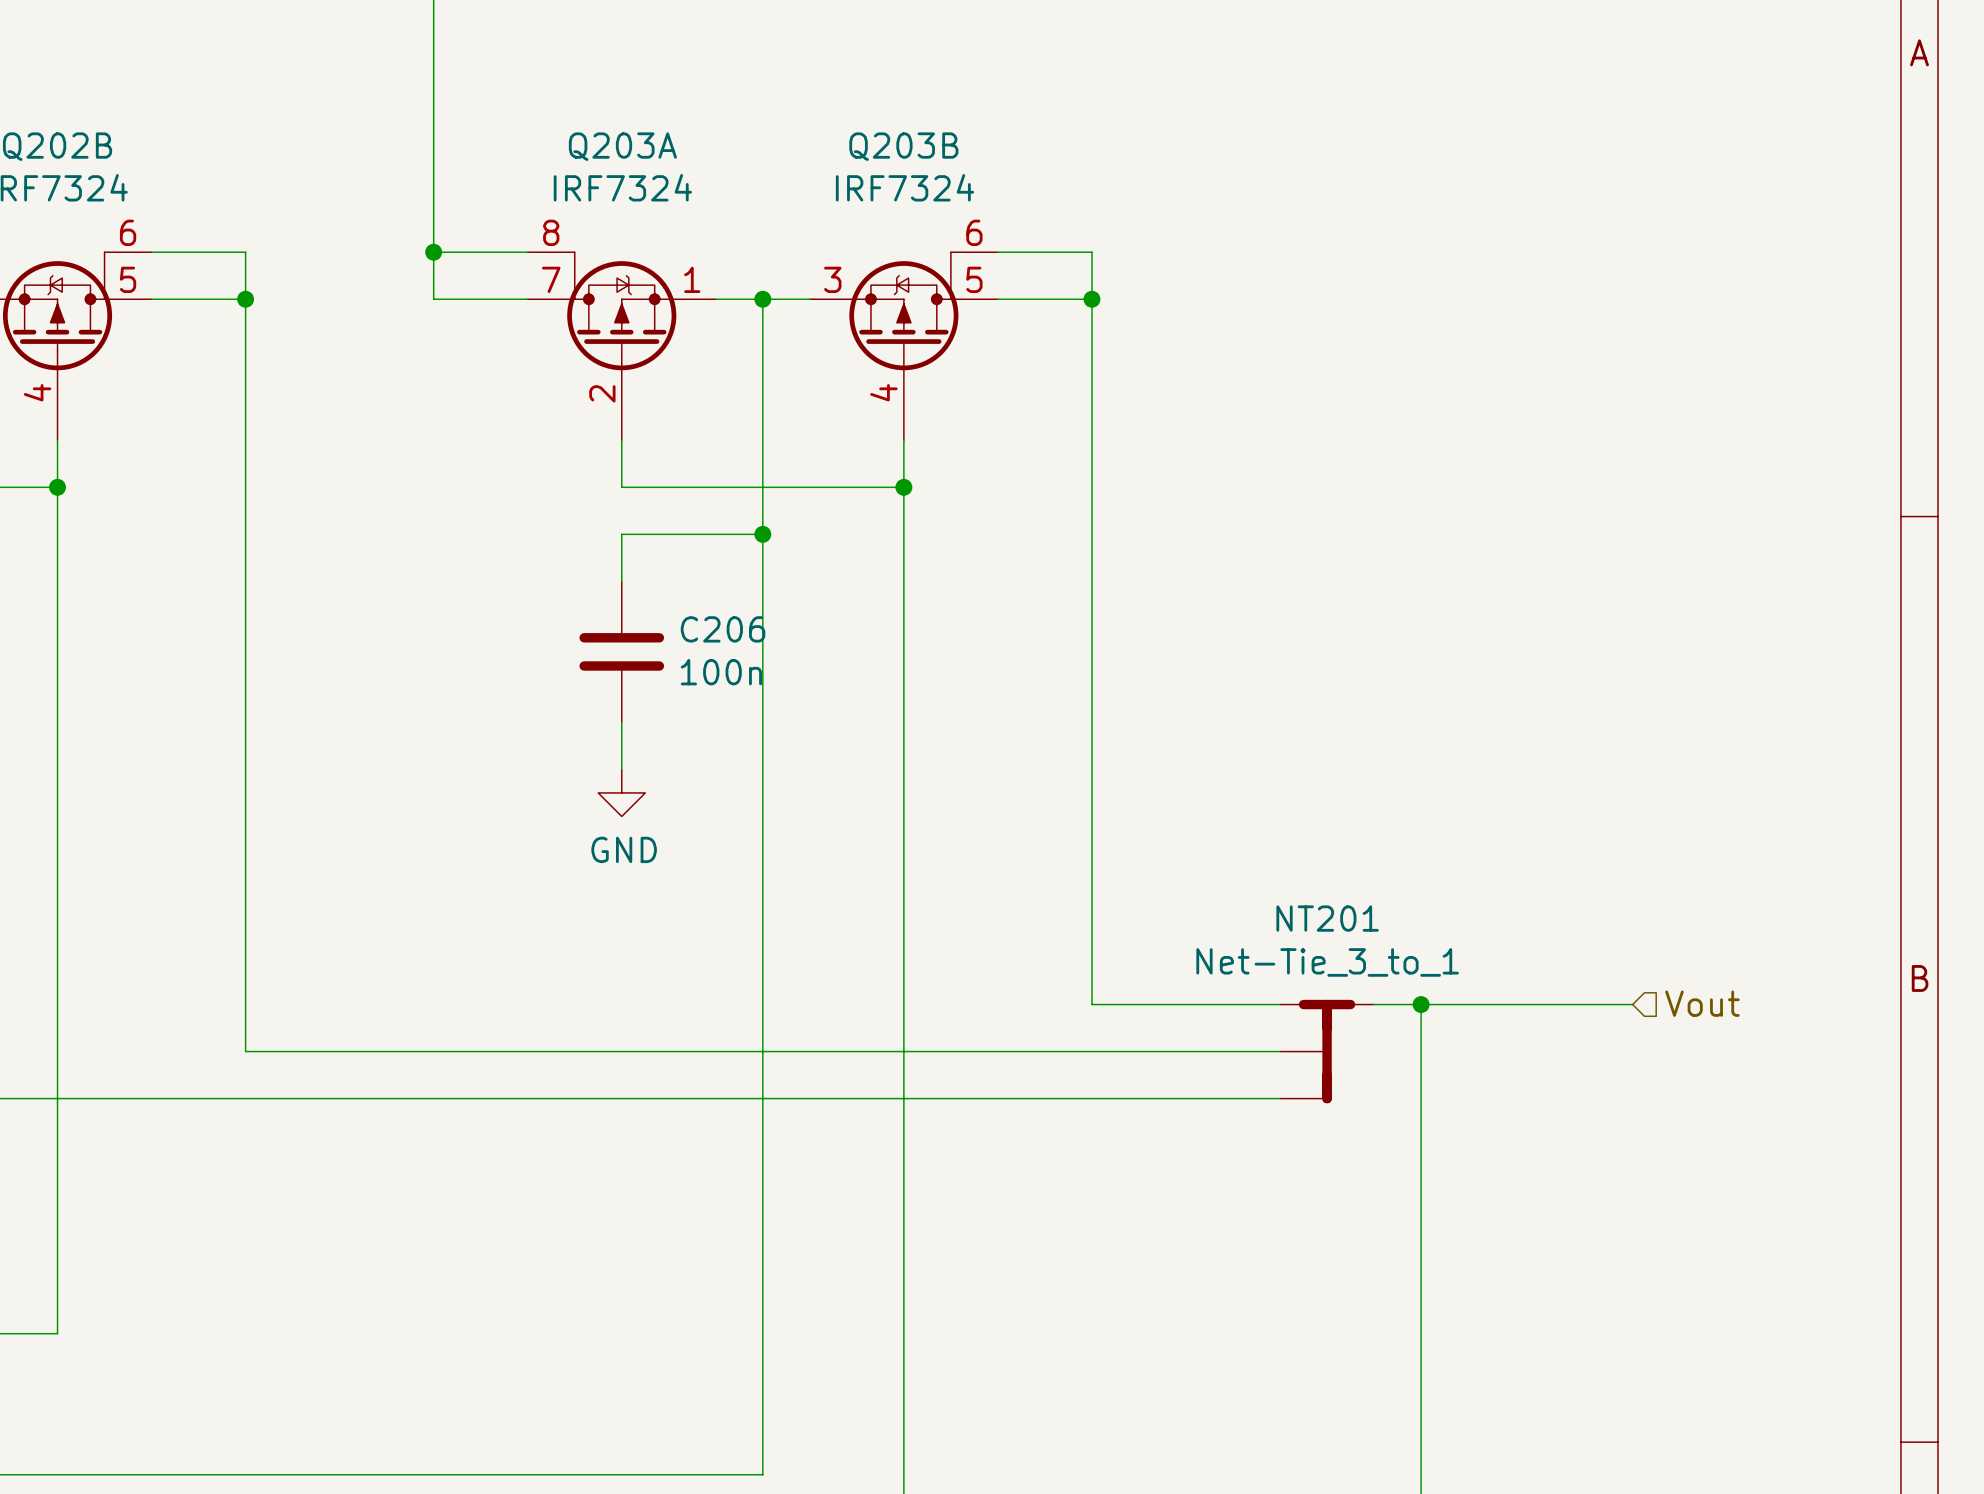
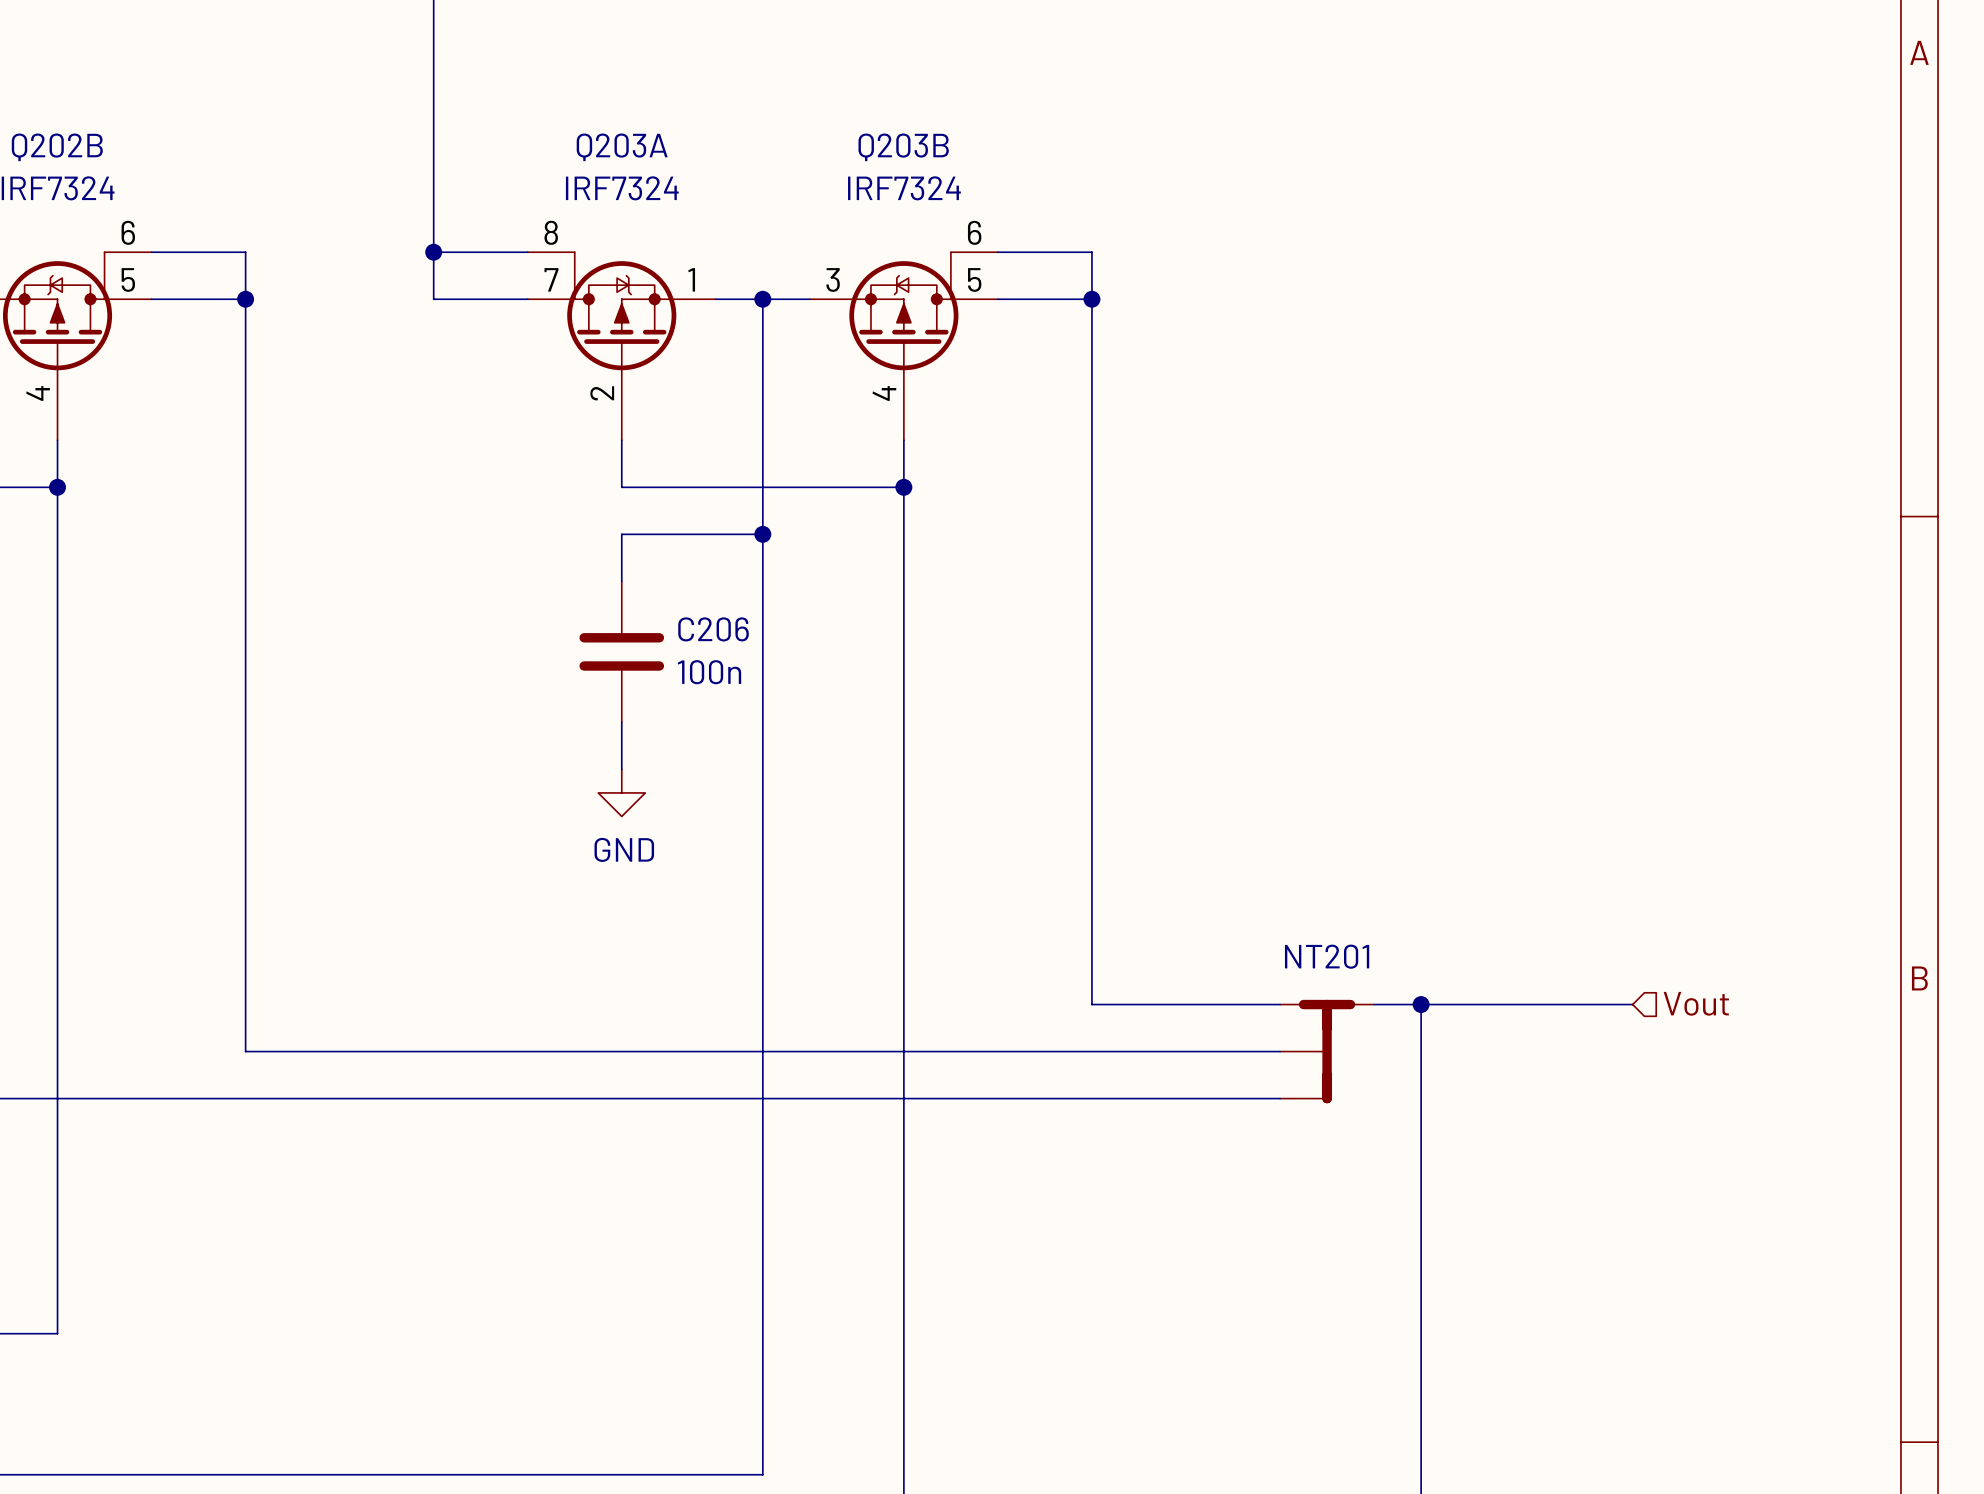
NT201 name position: NT201 (1327, 918) -> NT201 (1327, 956)
NT201 value: Net-Tie_3_to_1 (1327, 962) -> none

